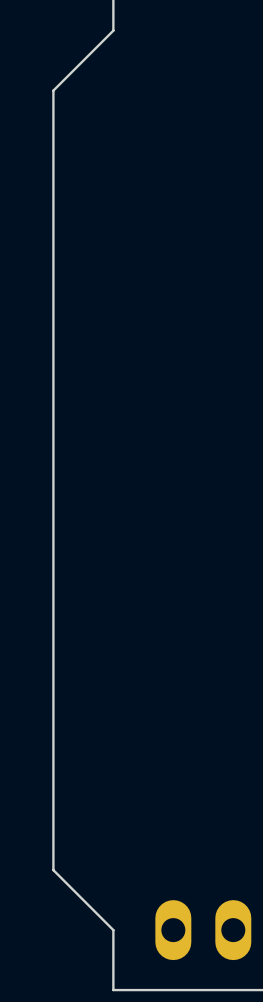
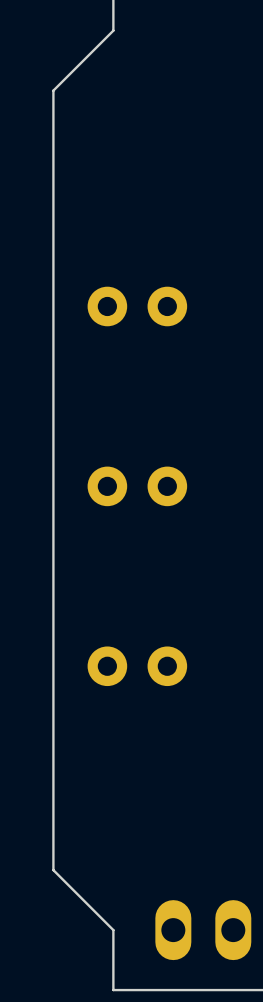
part: none -> (137, 306)
part: none -> (137, 486)
part: none -> (137, 666)

